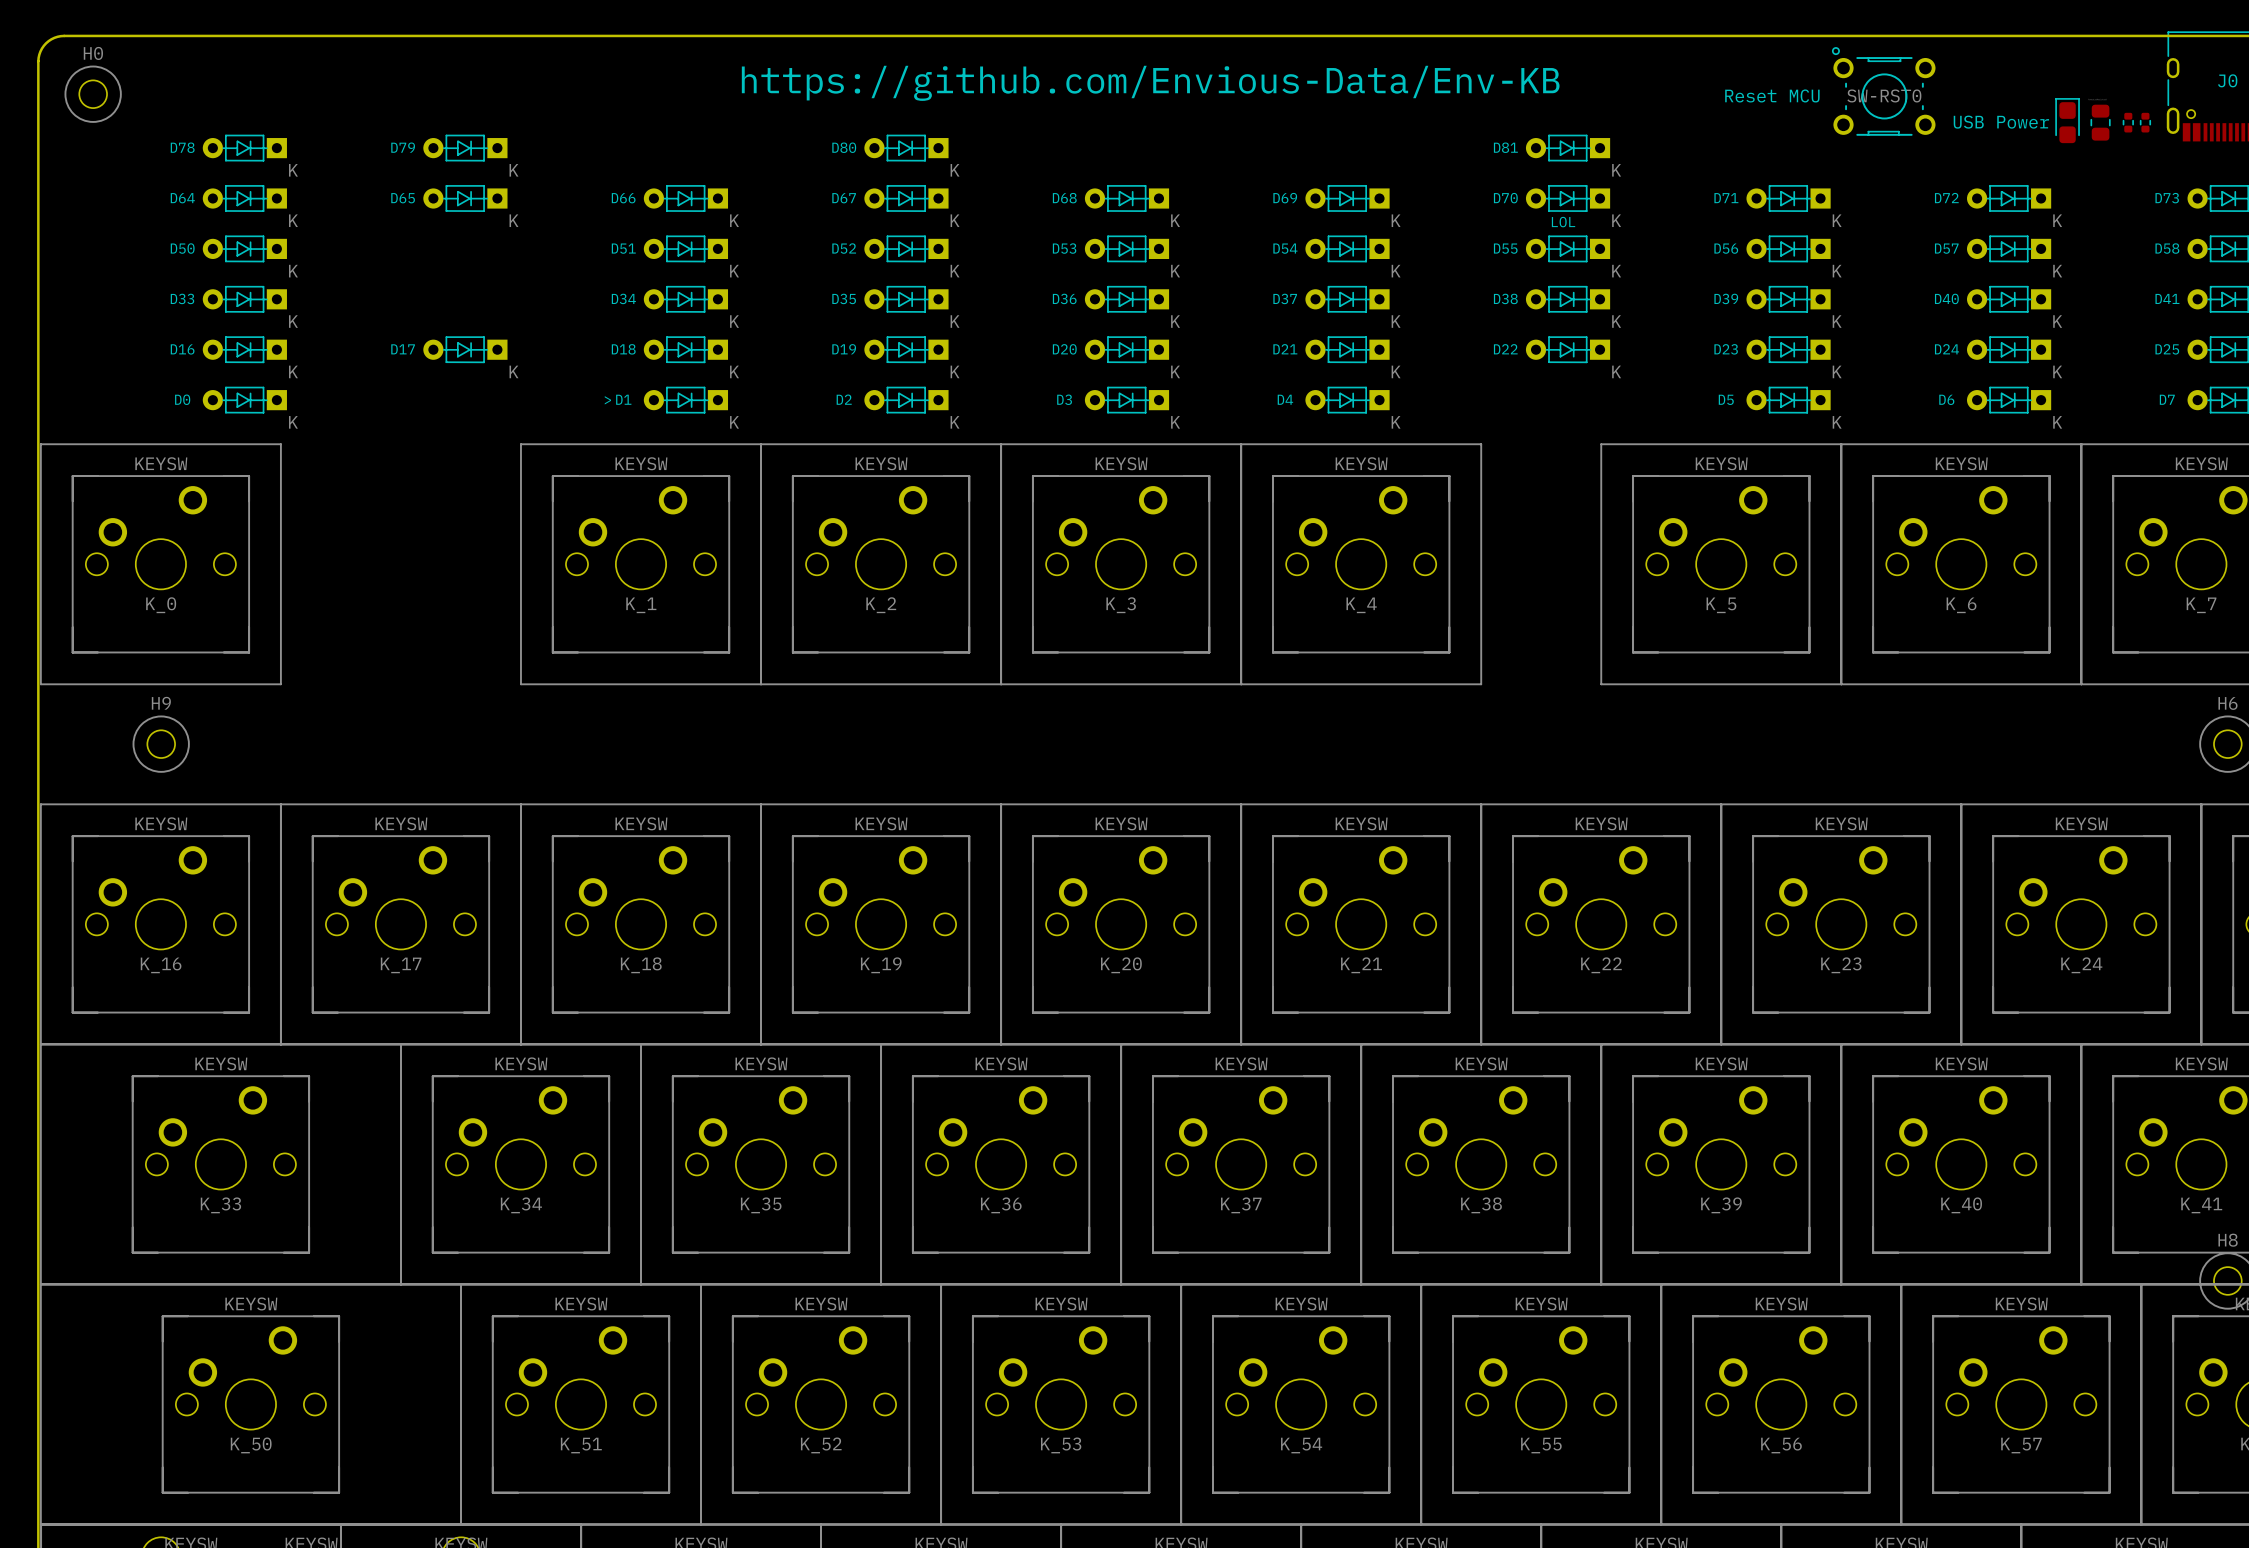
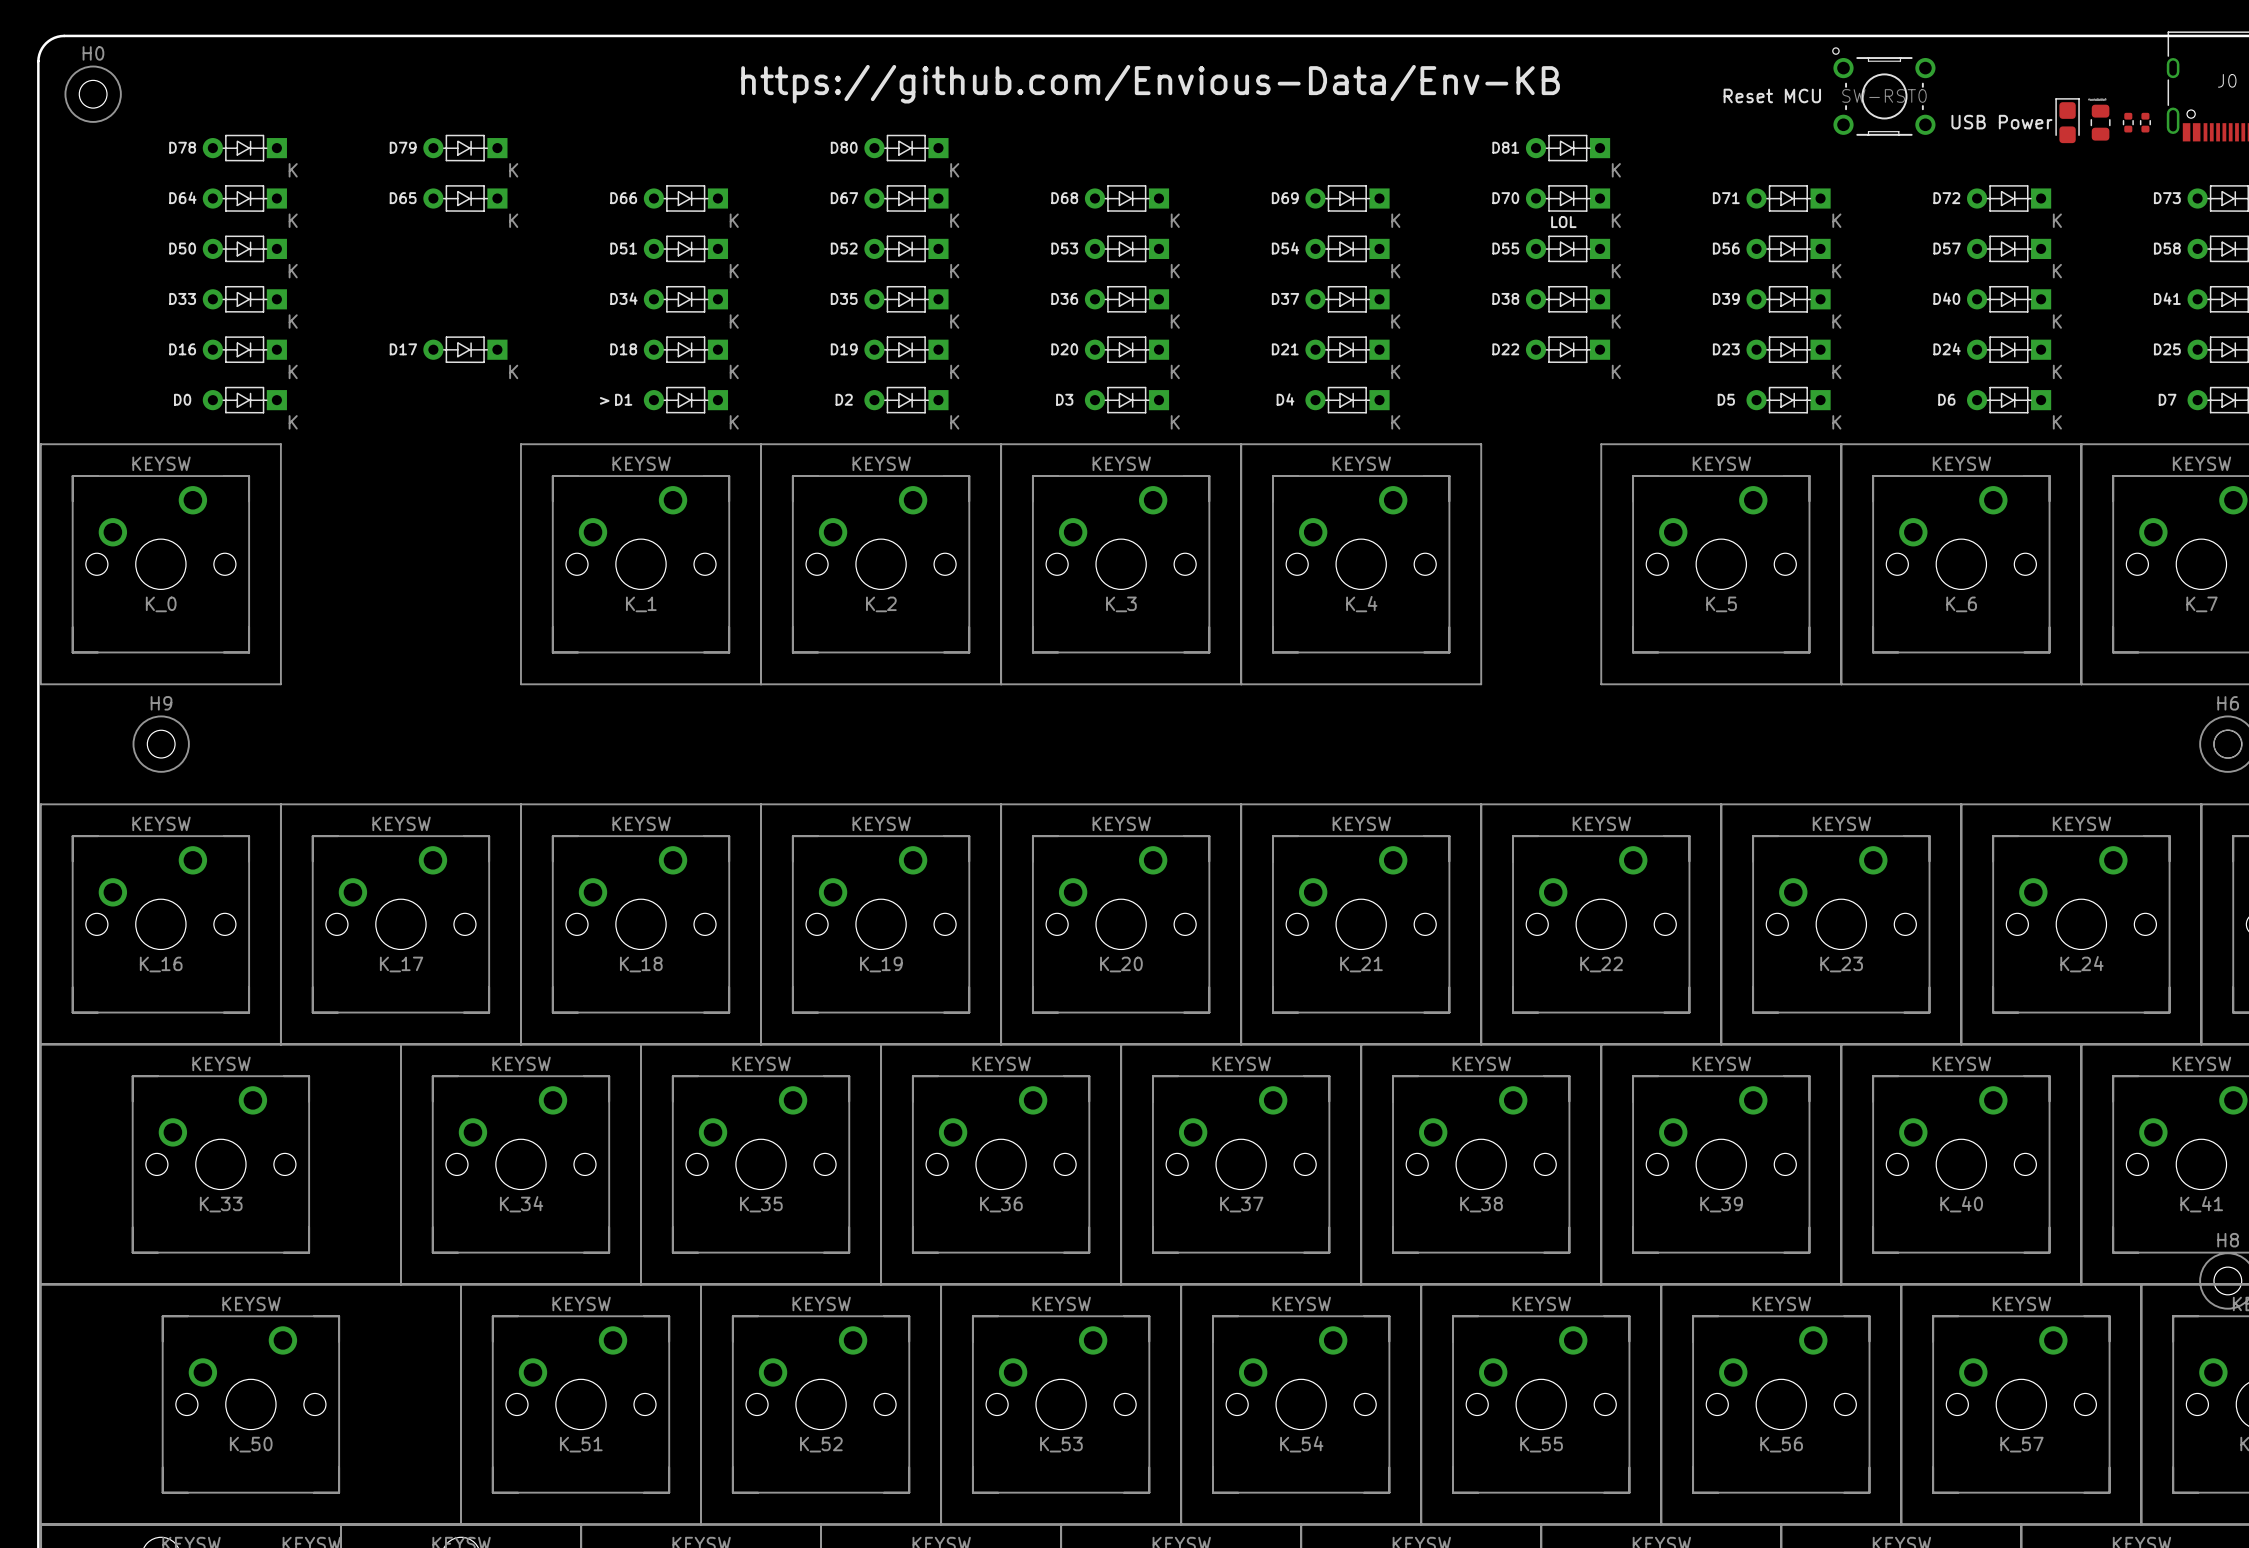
drawing: none -> [2213, 729, 2243, 759]

